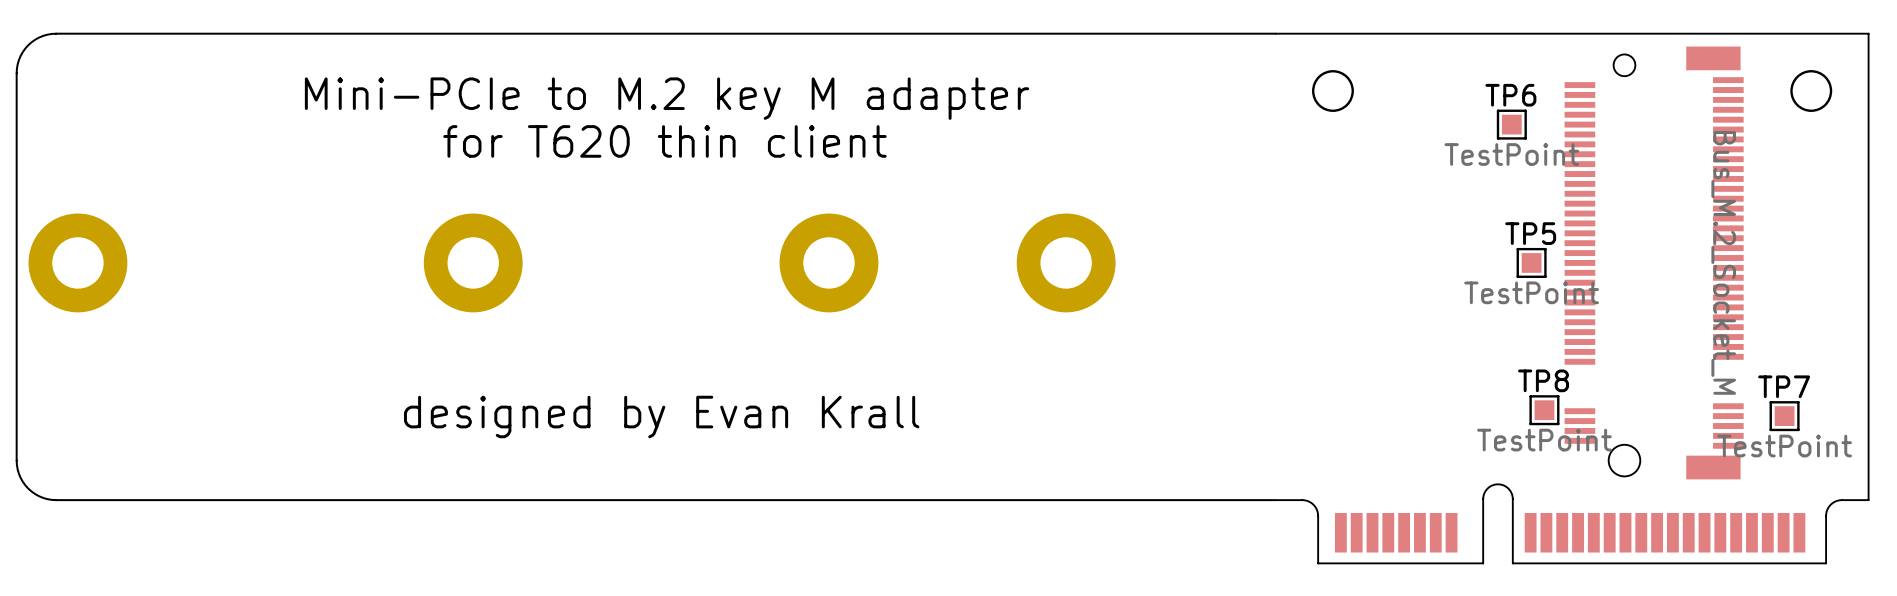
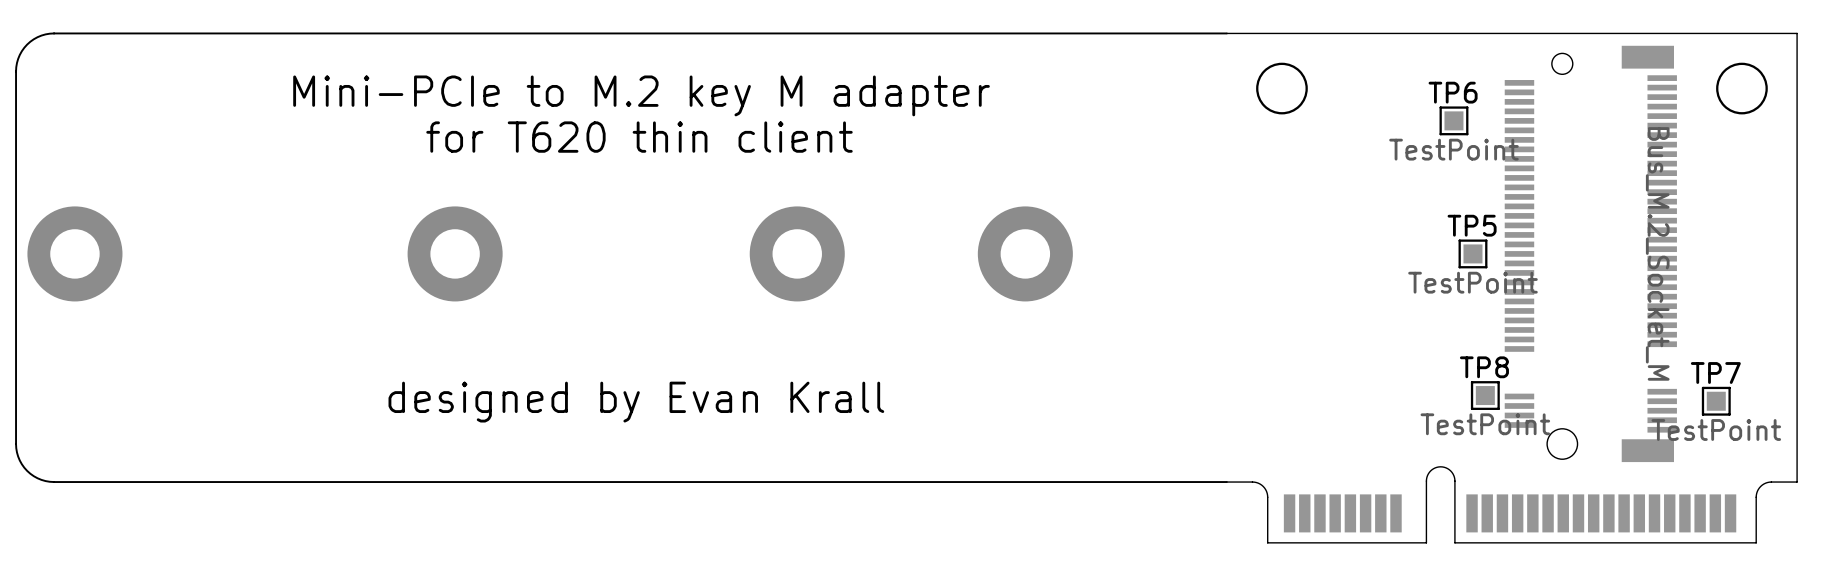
part footprint: [1275, 33, 1869, 564] -> [1226, 33, 1798, 543]

